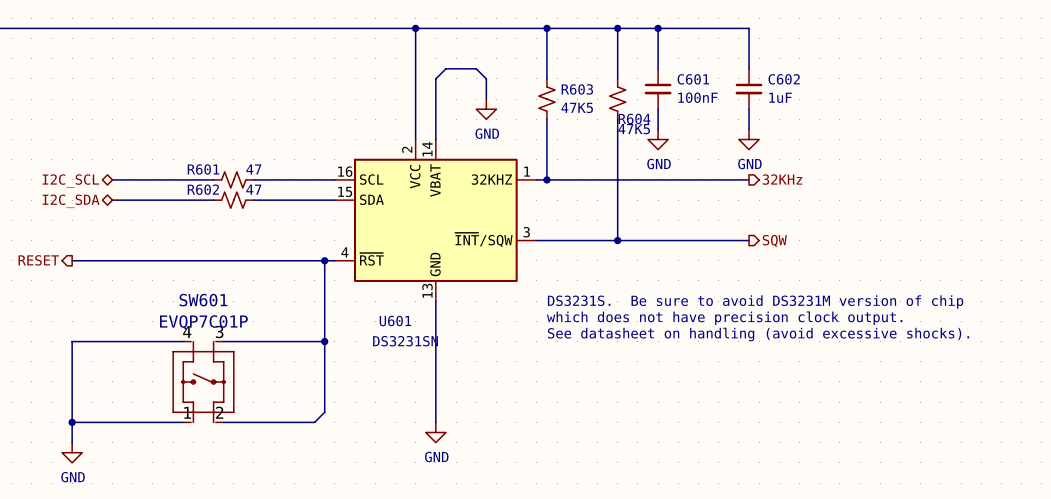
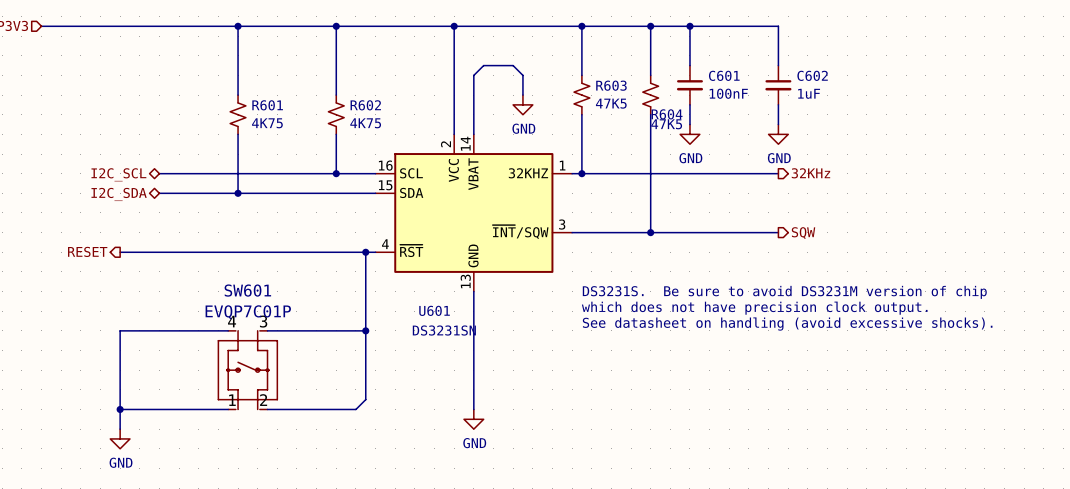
wire: none -> (238, 26) (238, 95)
junction: none -> (238, 26)
wire: none -> (336, 26) (336, 95)
junction: none -> (336, 26)
wire: none -> (238, 134) (238, 193)
wire: none -> (336, 134) (336, 173)
R601 name position: R601 (203, 169) -> R601 (267, 105)
R601 value: 47 (253, 169) -> 4K75 (267, 123)
R601 rotation: 0° (233, 179) -> 90° clockwise (238, 114)
R601 position: (233, 179) -> (238, 114)
junction: none -> (336, 173)
R602 name position: R602 (203, 189) -> R602 (365, 105)
R602 value: 47 (253, 189) -> 4K75 (365, 123)
junction: none -> (238, 193)
R602 rotation: 0° (233, 200) -> 90° clockwise (336, 114)
R602 position: (233, 200) -> (336, 114)

